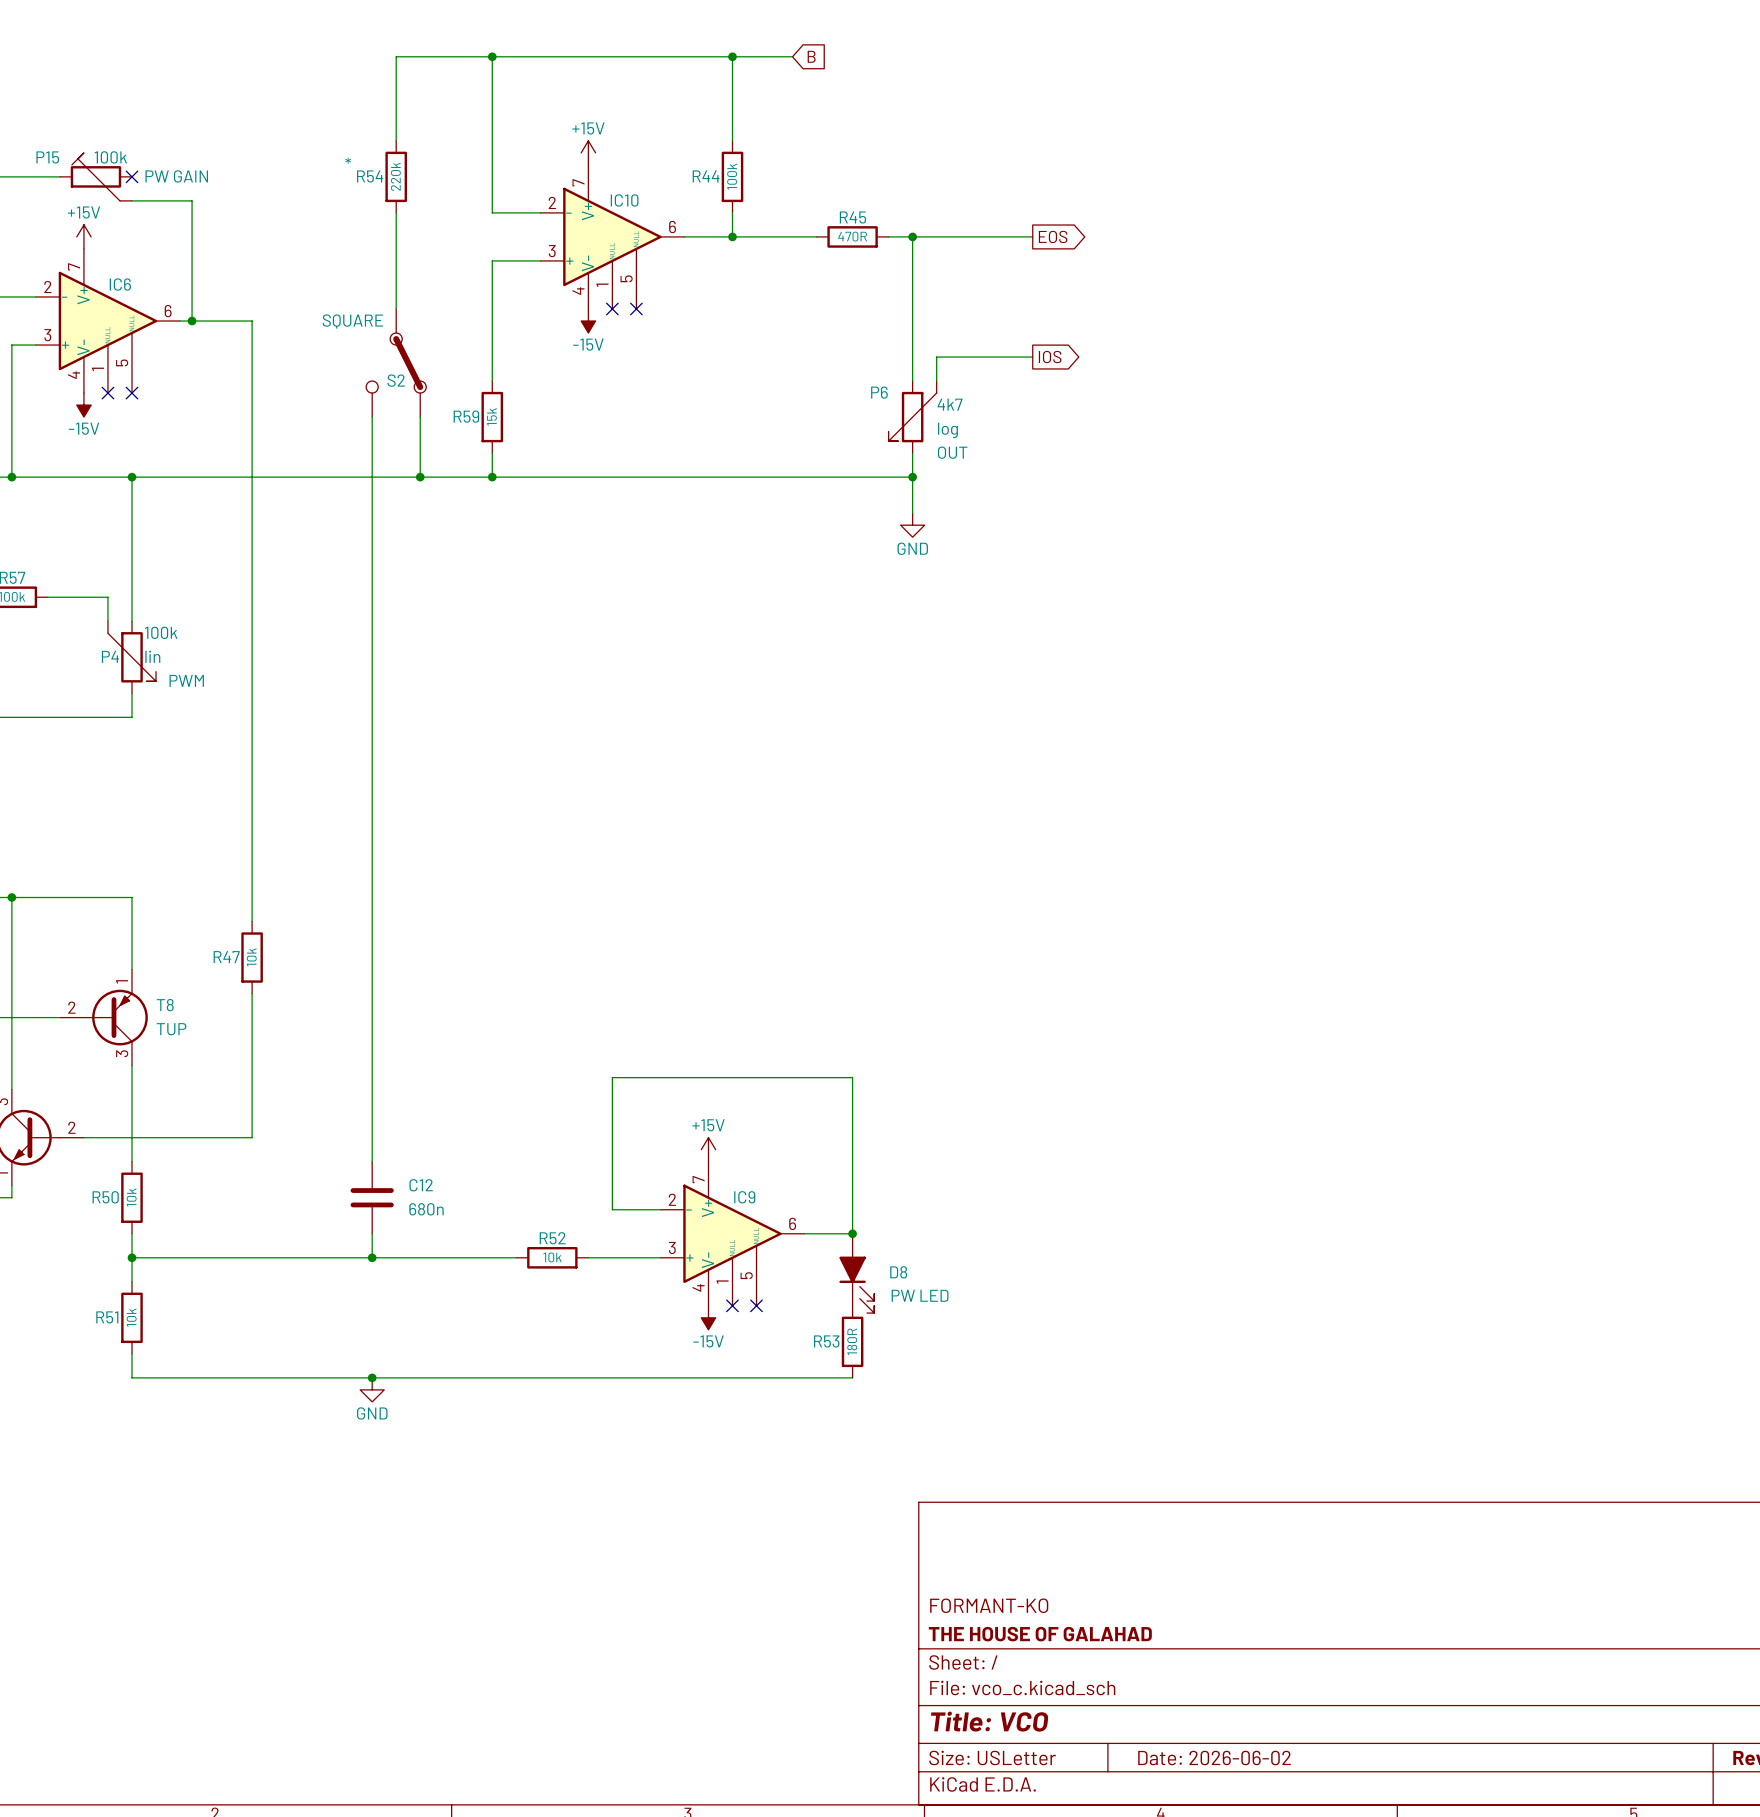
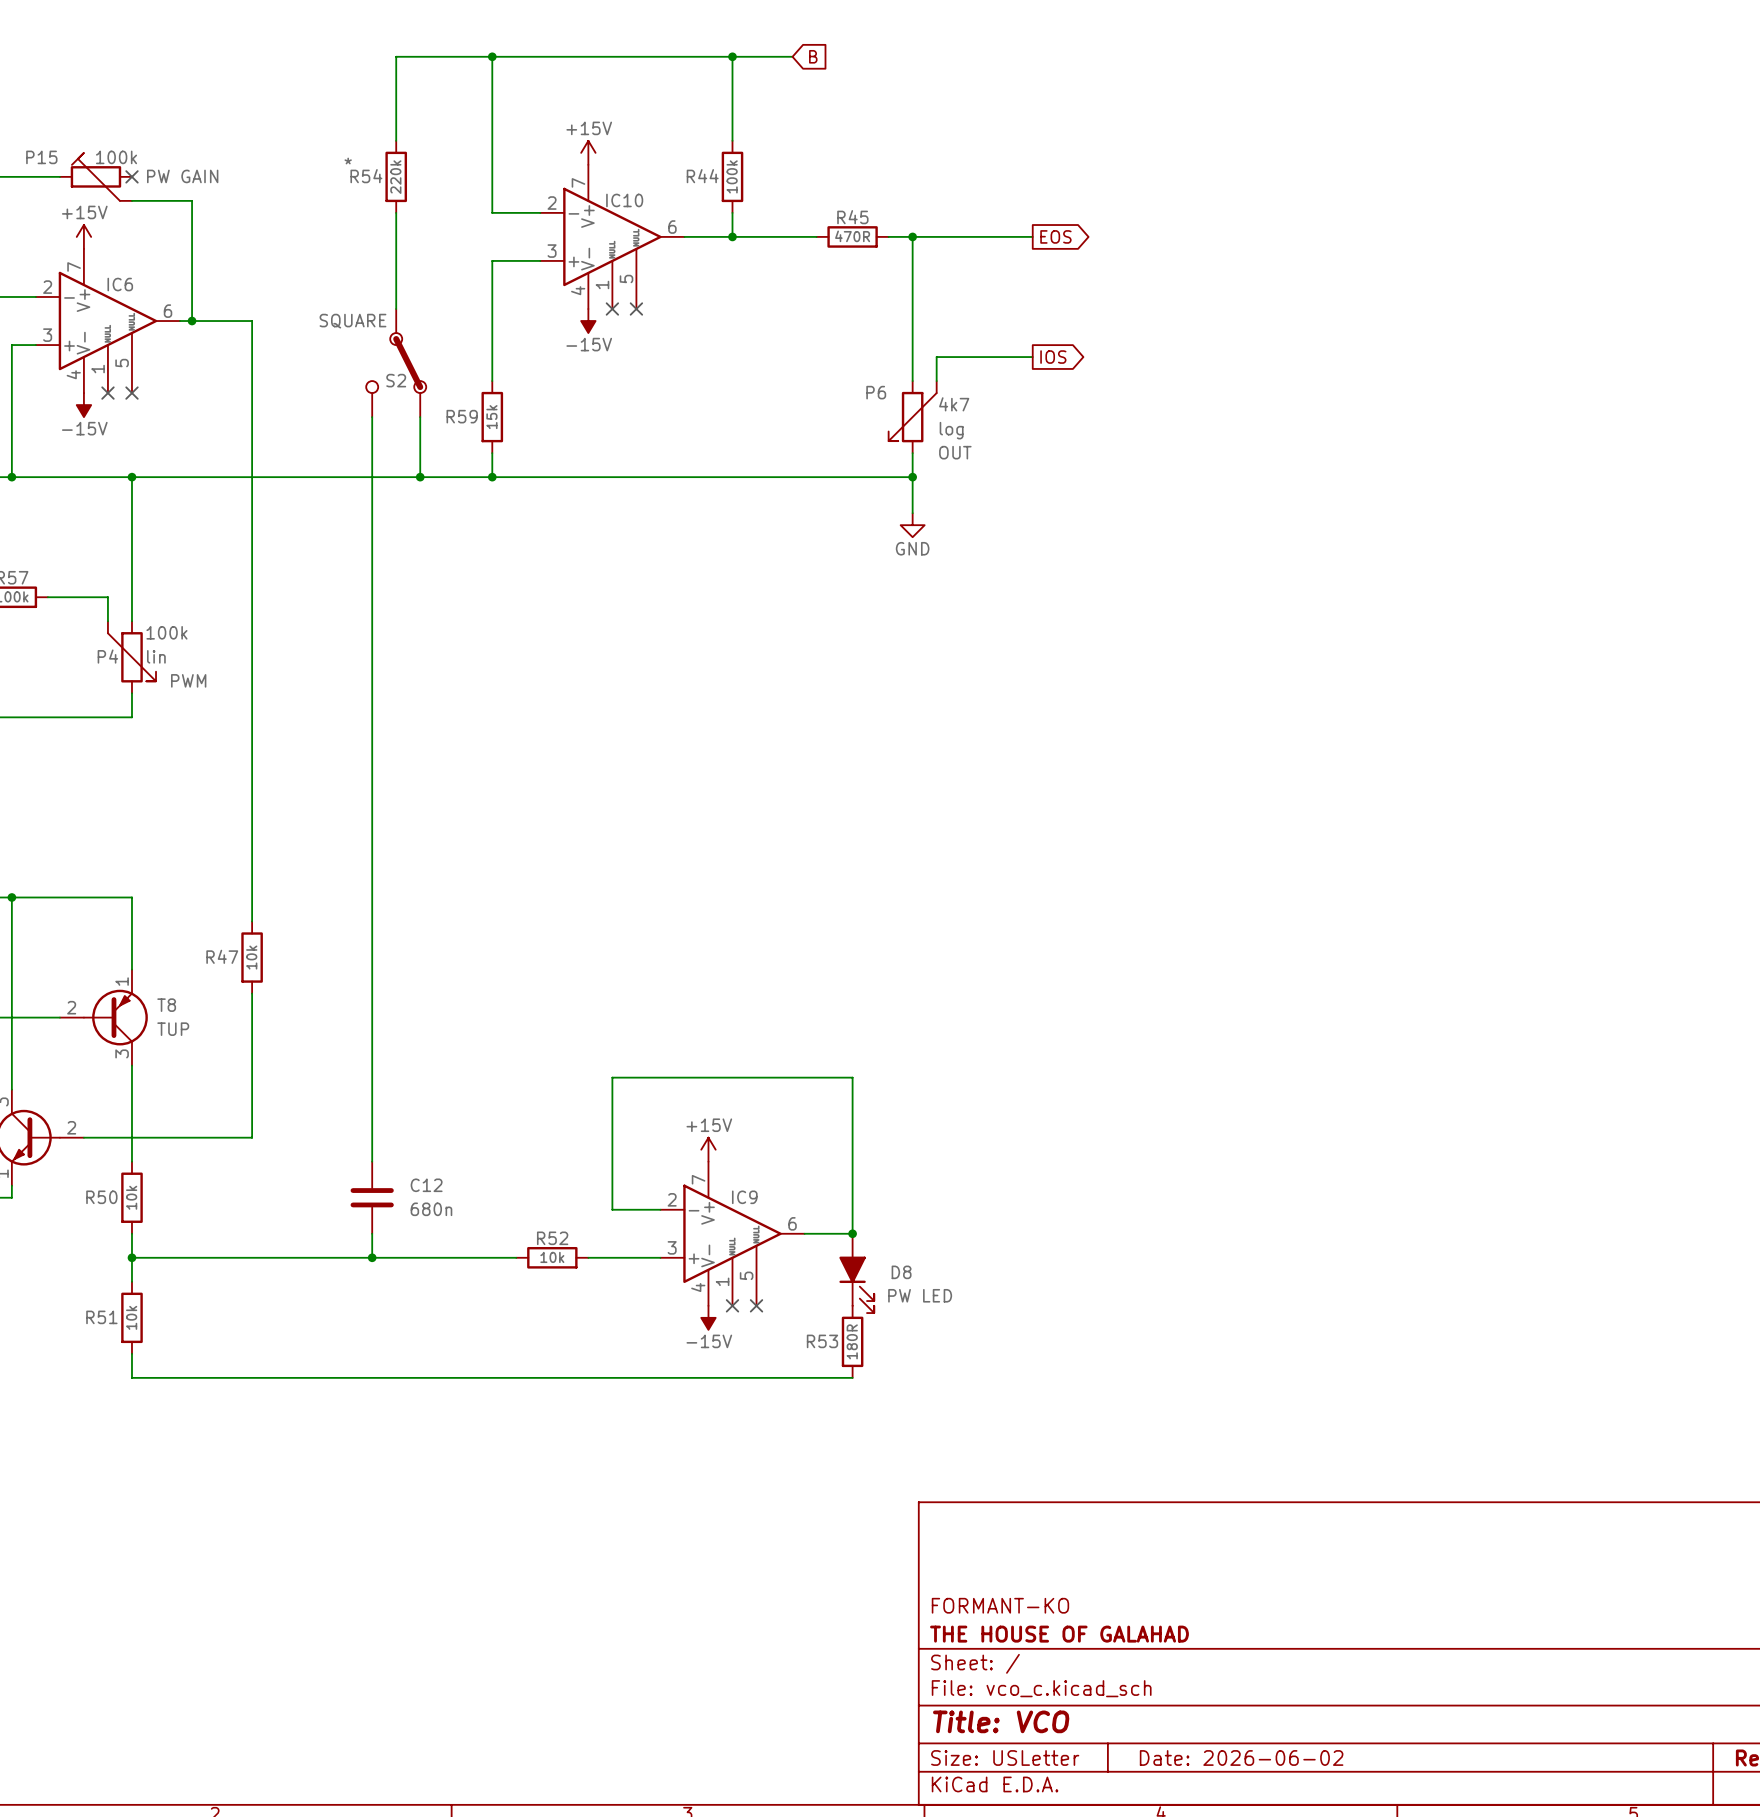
junction: (372, 1377) -> none
power symbol: GND (372, 1389) -> none

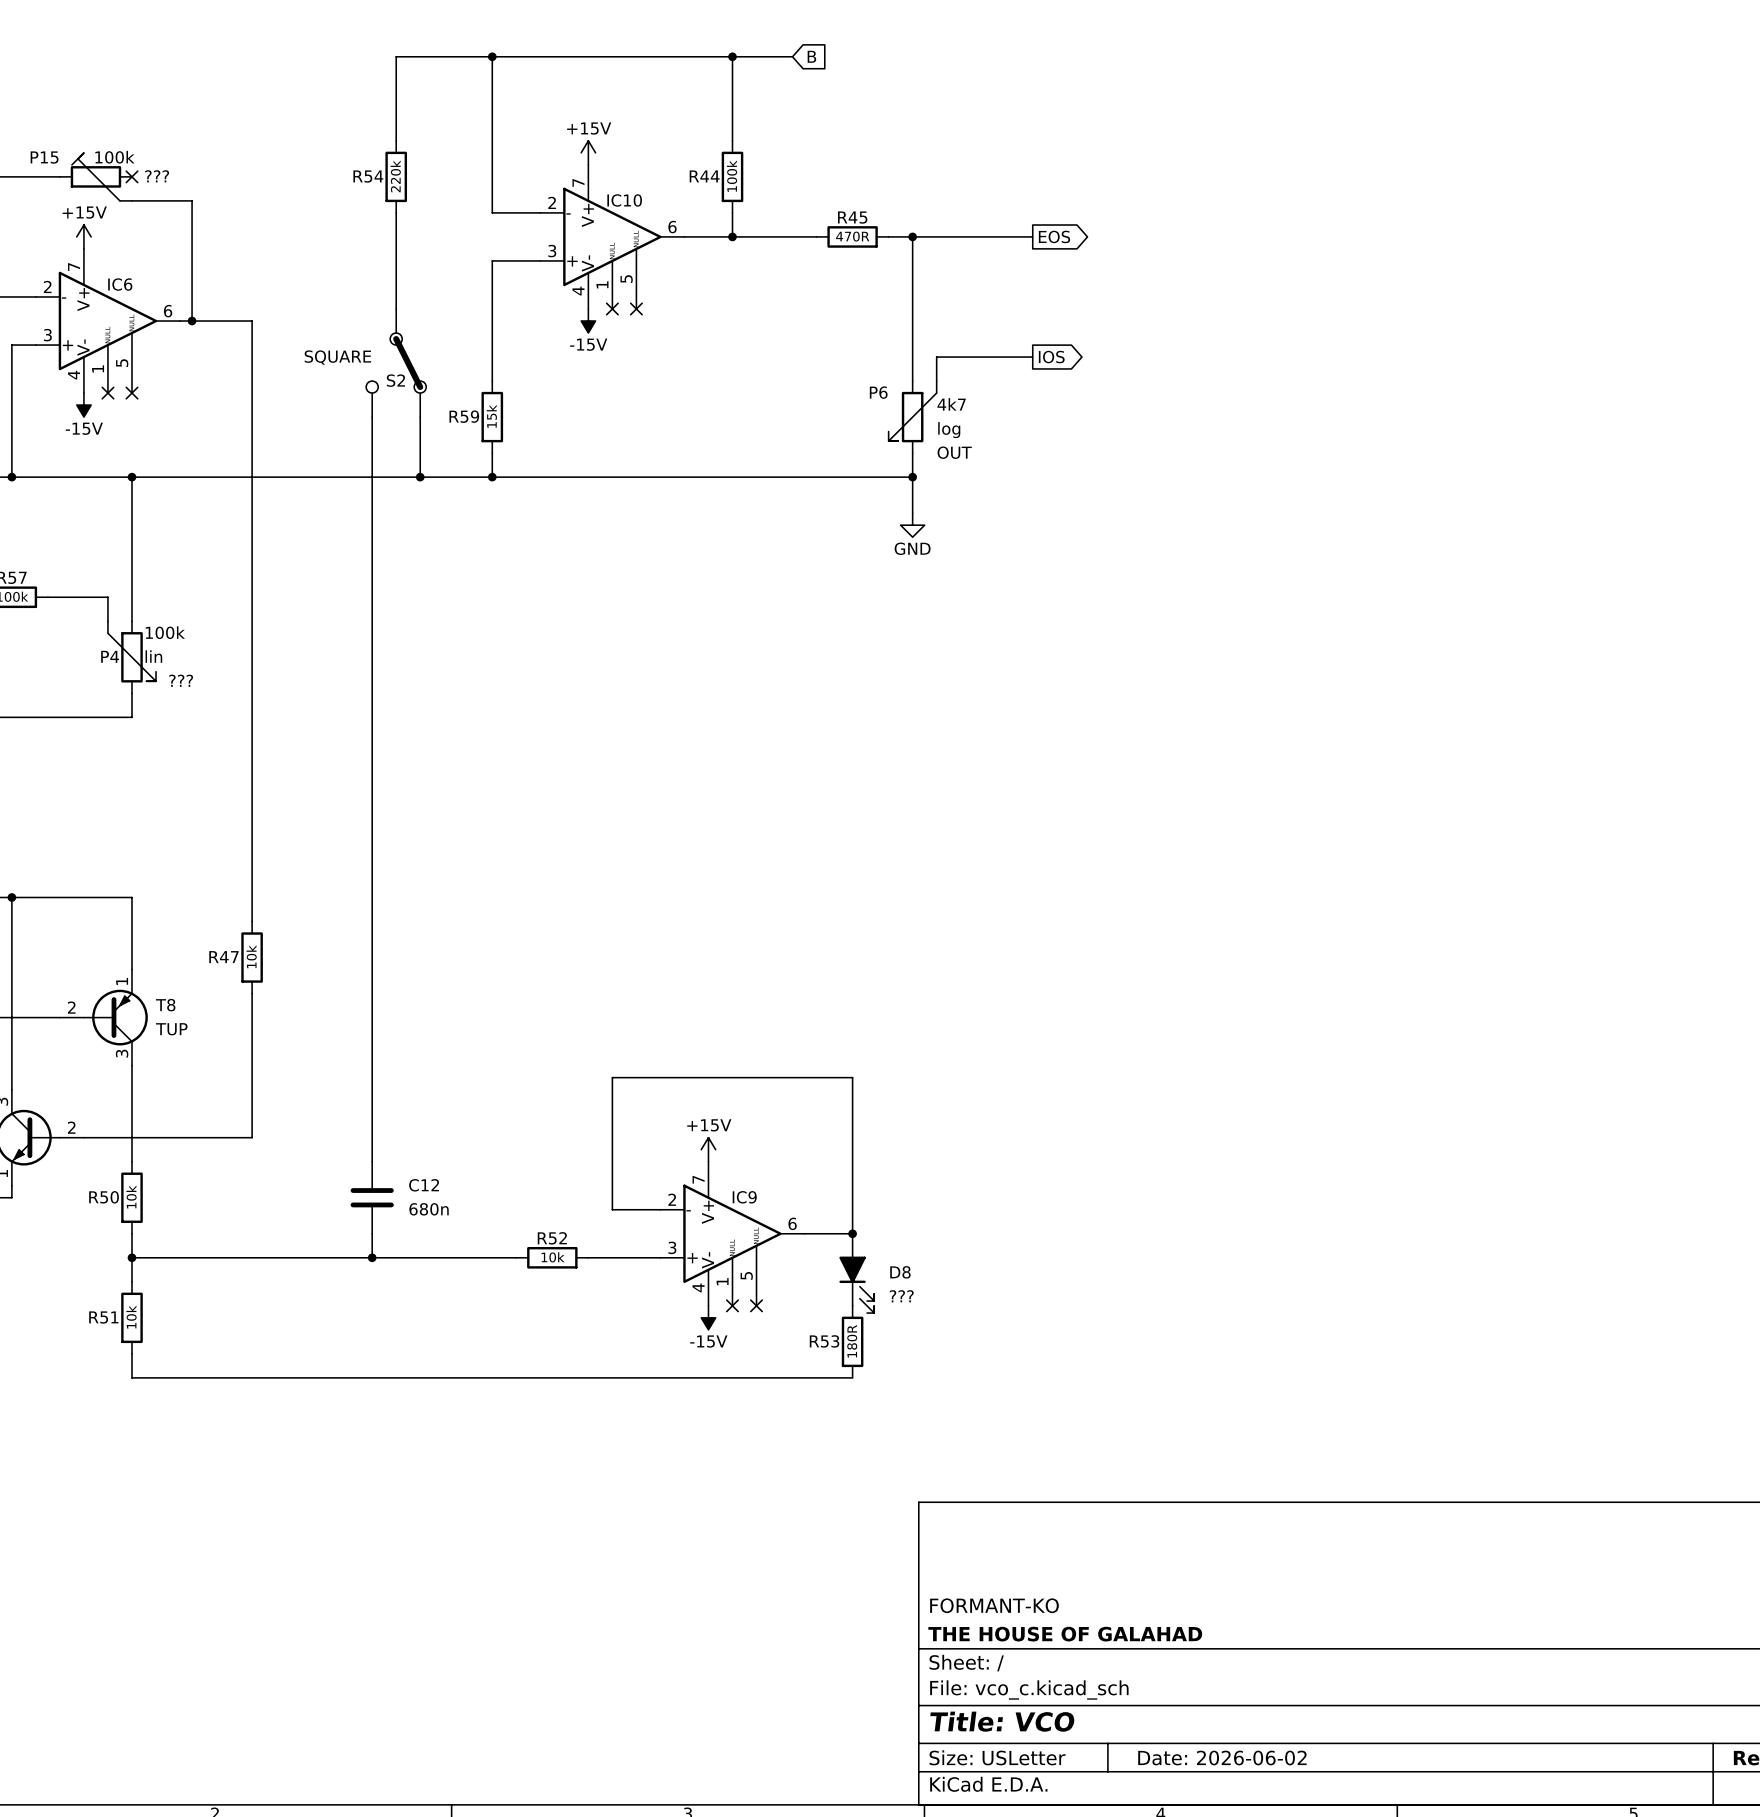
R54 text: * (348, 161) -> none
P15 text: PW GAIN (182, 176) -> ??? (157, 176)
S2 value: SQUARE (352, 321) -> none
S2 text: none -> SQUARE (337, 357)
P4 text: PWM (188, 680) -> ??? (181, 680)
D8 value: PW LED (920, 1295) -> none
D8 text: none -> ??? (901, 1296)

